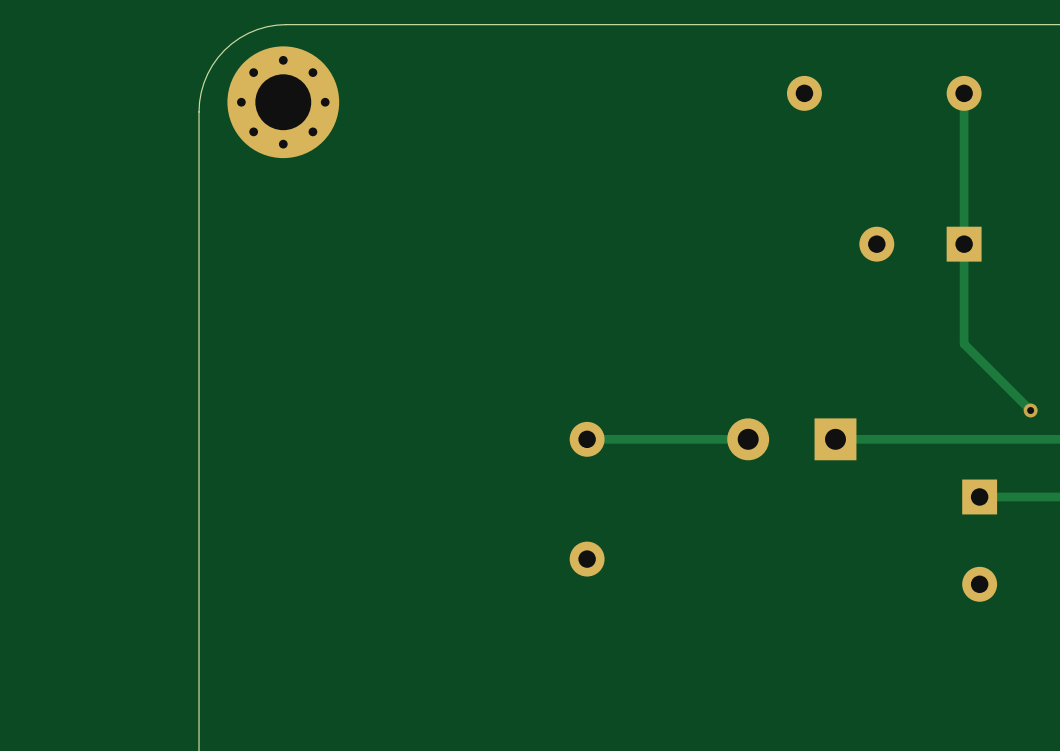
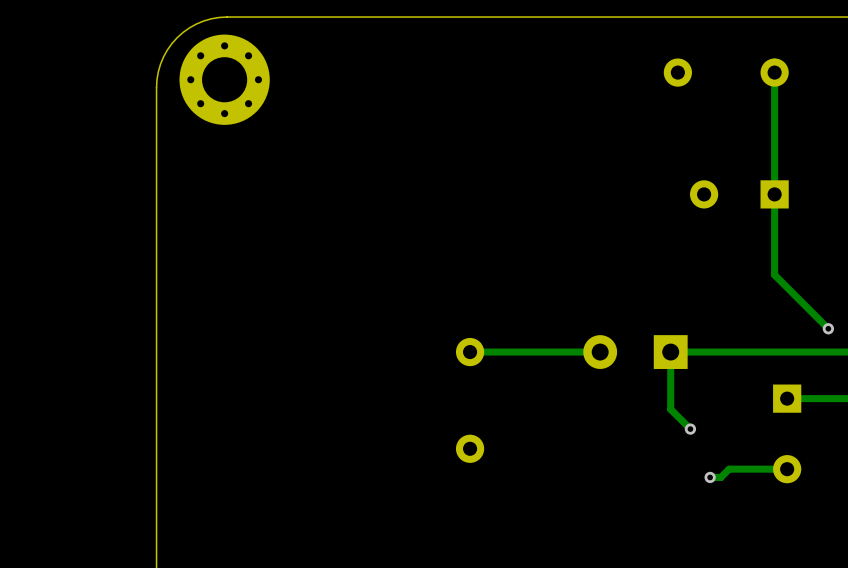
part position: (804, 93) -> (677, 72)
track: none -> (670, 352) (670, 409) (690, 429)
via: none -> (690, 429)
track: none -> (787, 469) (729, 469) (720, 477) (710, 477)
via: none -> (710, 477)

